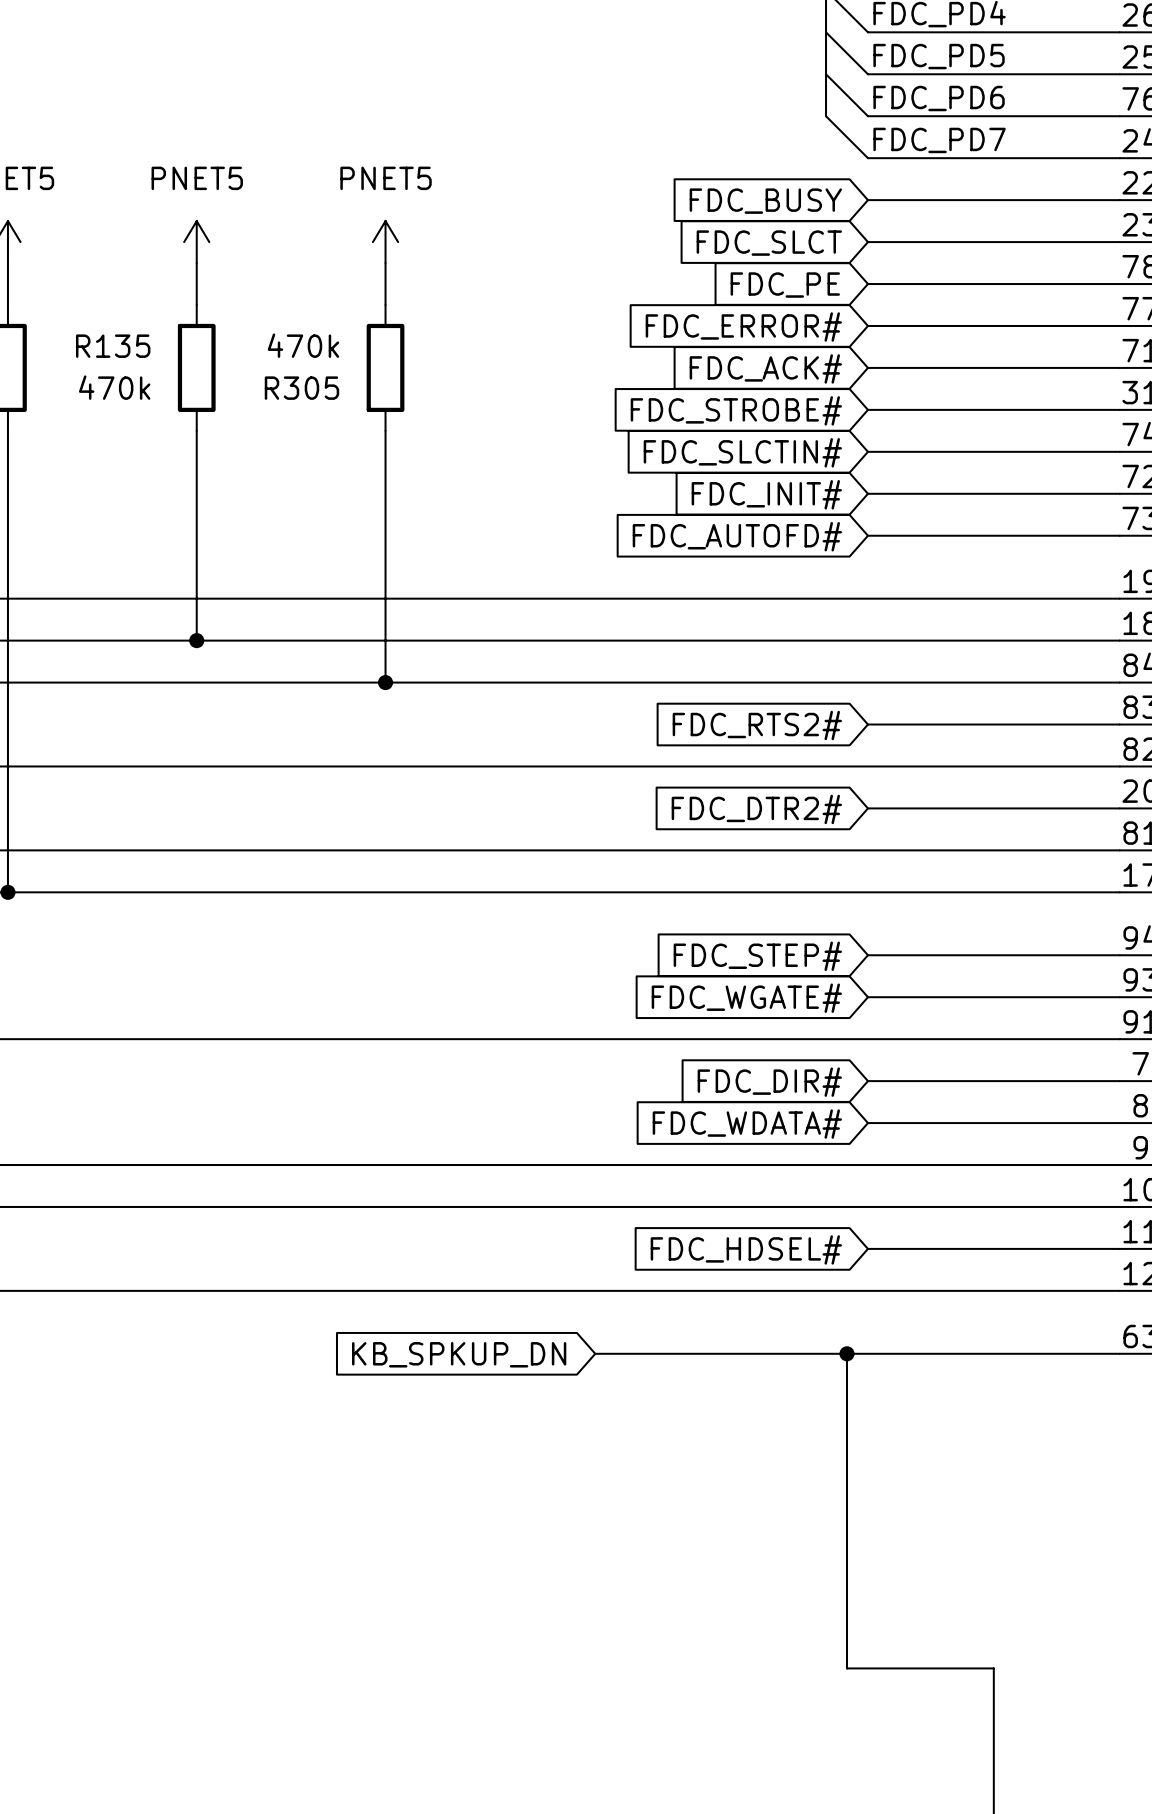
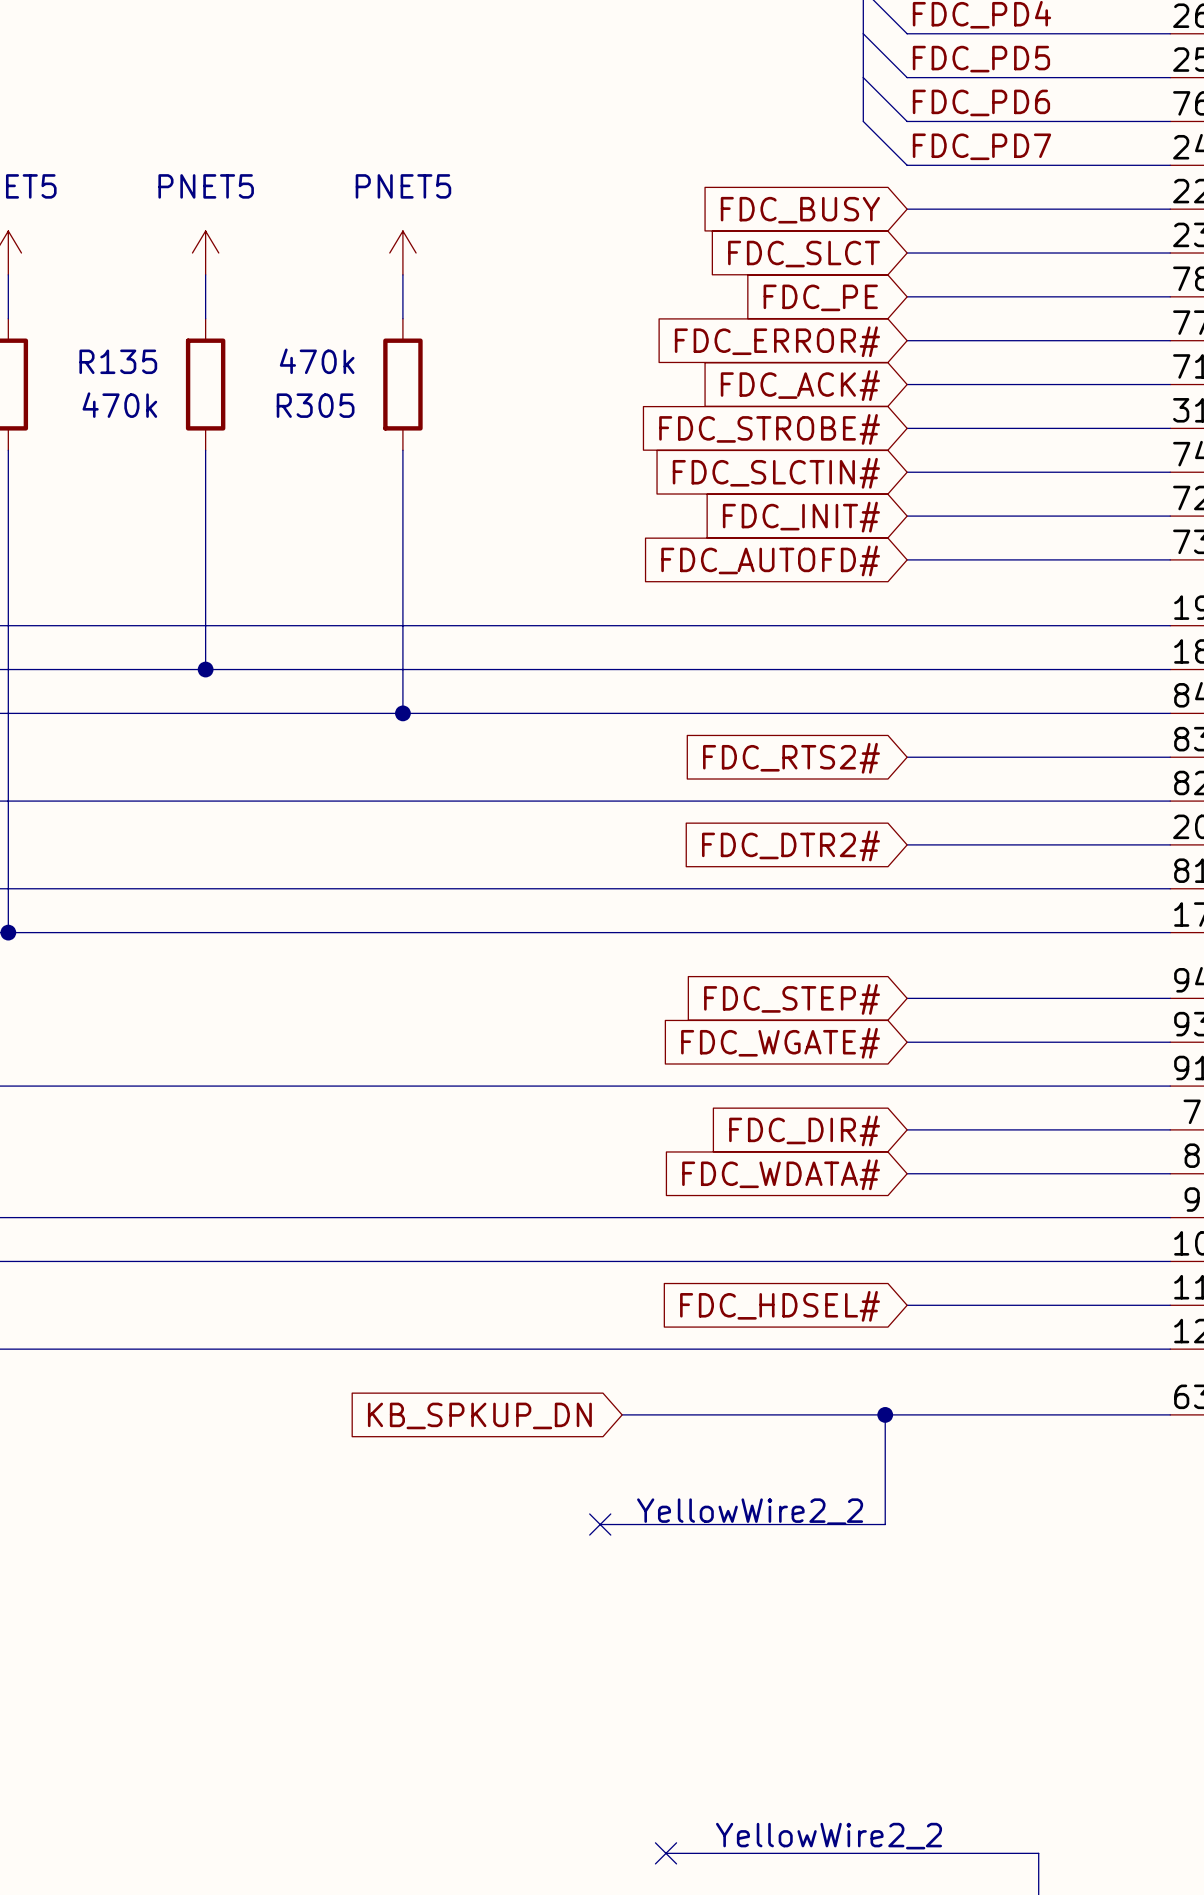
text: none -> YellowWire2_2 (750, 1511)
wire: none -> (600, 1524) (885, 1524)
no-connect mark: none -> (600, 1524)
wire: (847, 1458) (847, 1668) (993, 1668) (993, 1773) -> (666, 1853) (1038, 1853)
text: none -> YellowWire2_2 (829, 1836)
no-connect mark: none -> (666, 1853)

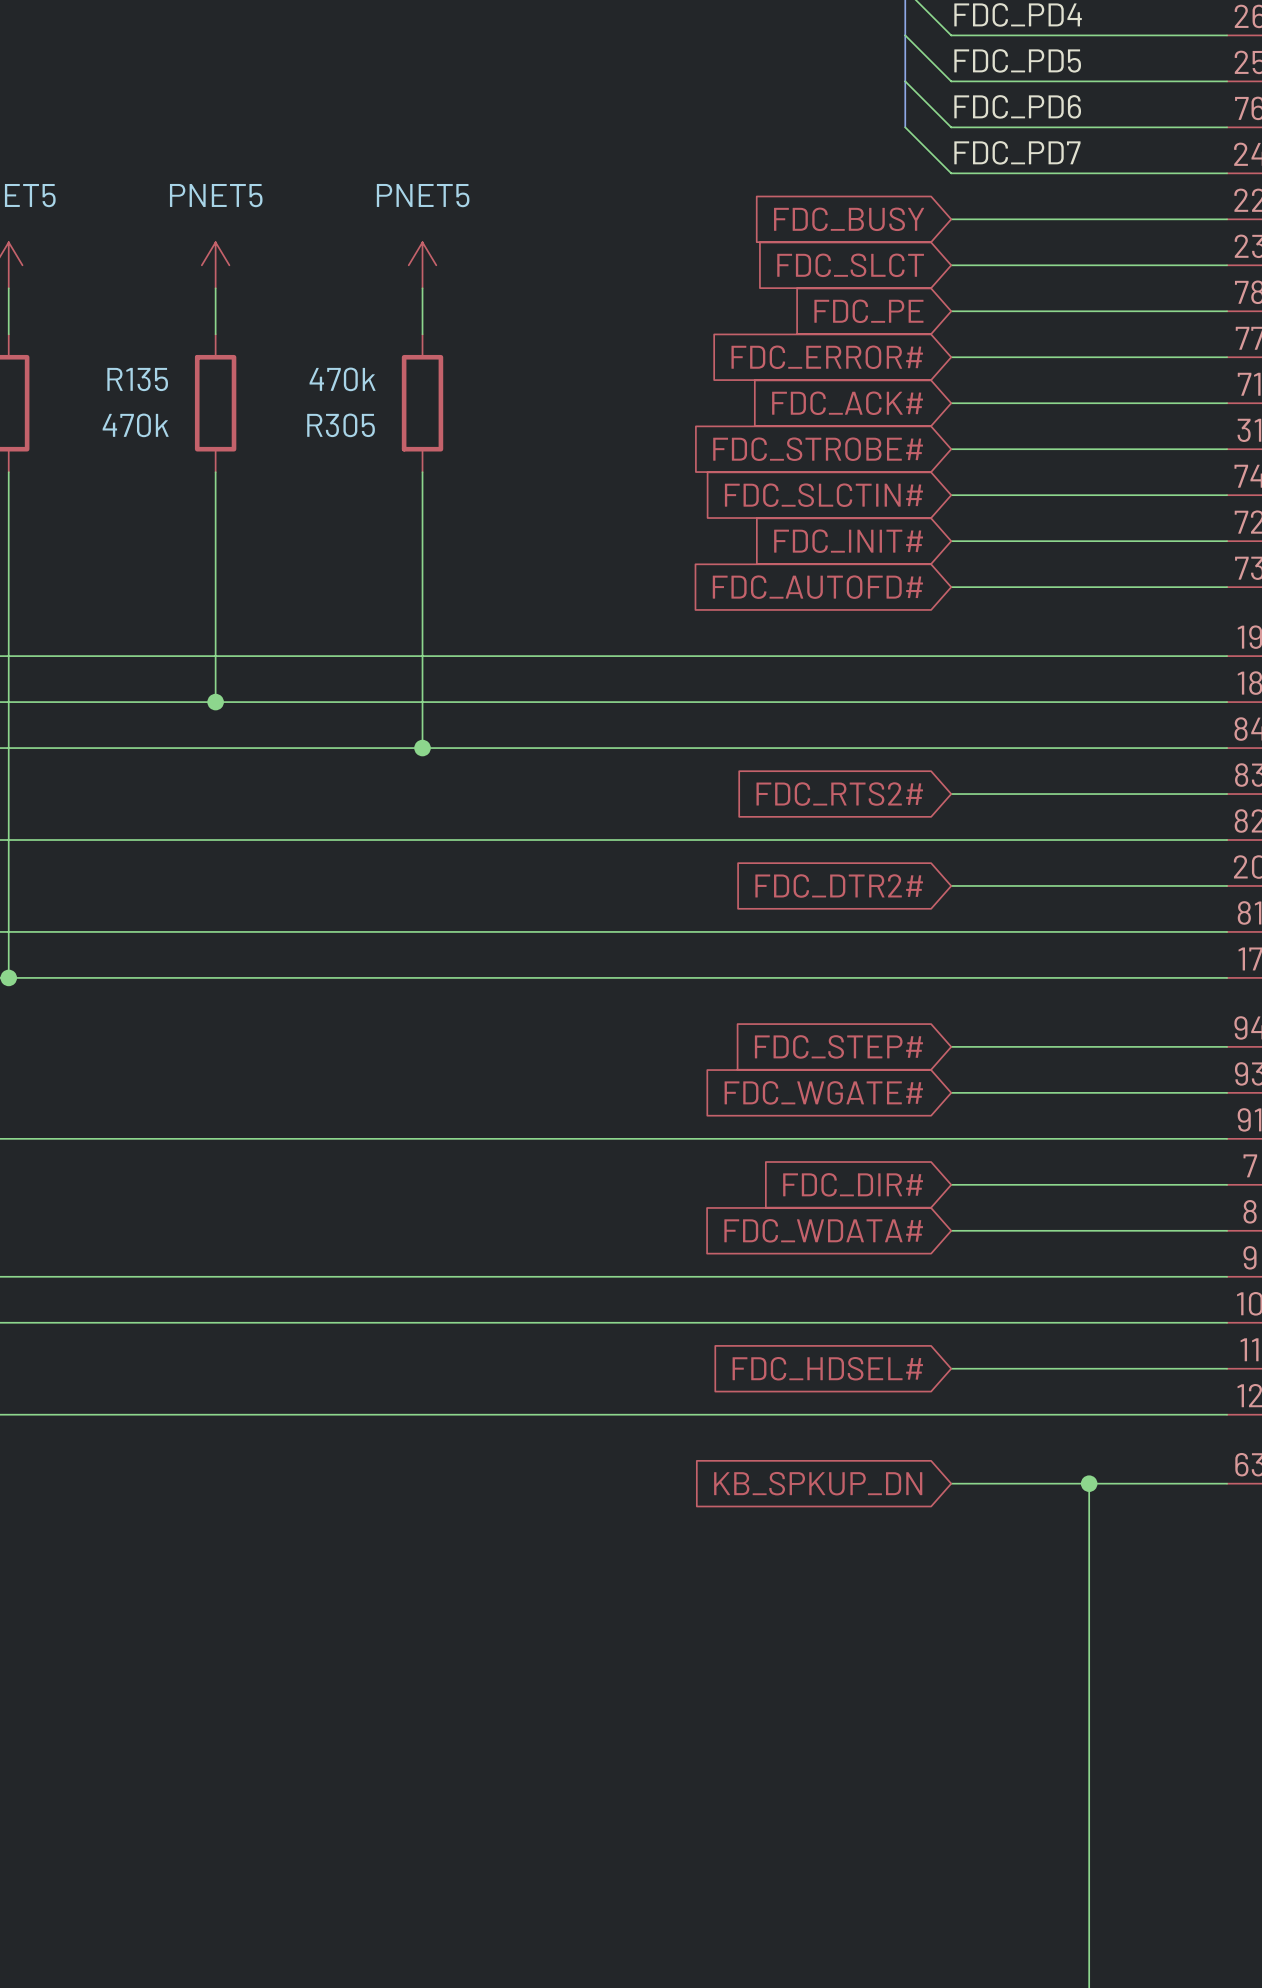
wire: (622, 1414) (907, 1414) -> none
wire: (885, 1414) (885, 1524) (600, 1524) -> none
junction: (885, 1414) -> none
junction: none -> (1089, 1483)
global label position: KB_SPKUP_DN (479, 1415) -> KB_SPKUP_DN (818, 1483)
text: YellowWire2_2 (750, 1511) -> none
no-connect mark: (600, 1524) -> none
text: YellowWire2_2 (829, 1836) -> none
wire: (666, 1853) (1038, 1853) -> (1089, 1483) (1089, 1943)
no-connect mark: (666, 1853) -> none

